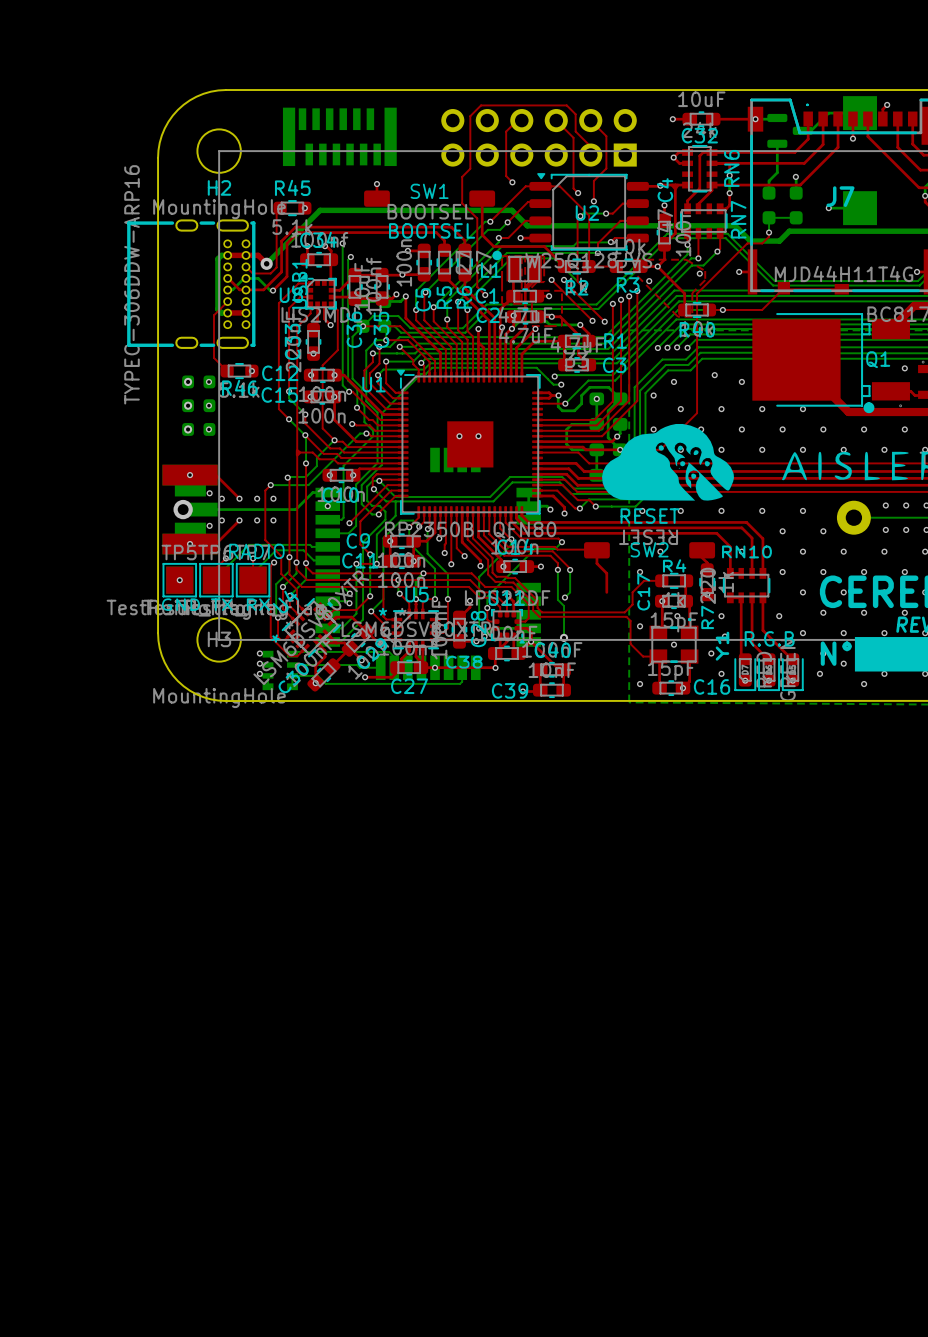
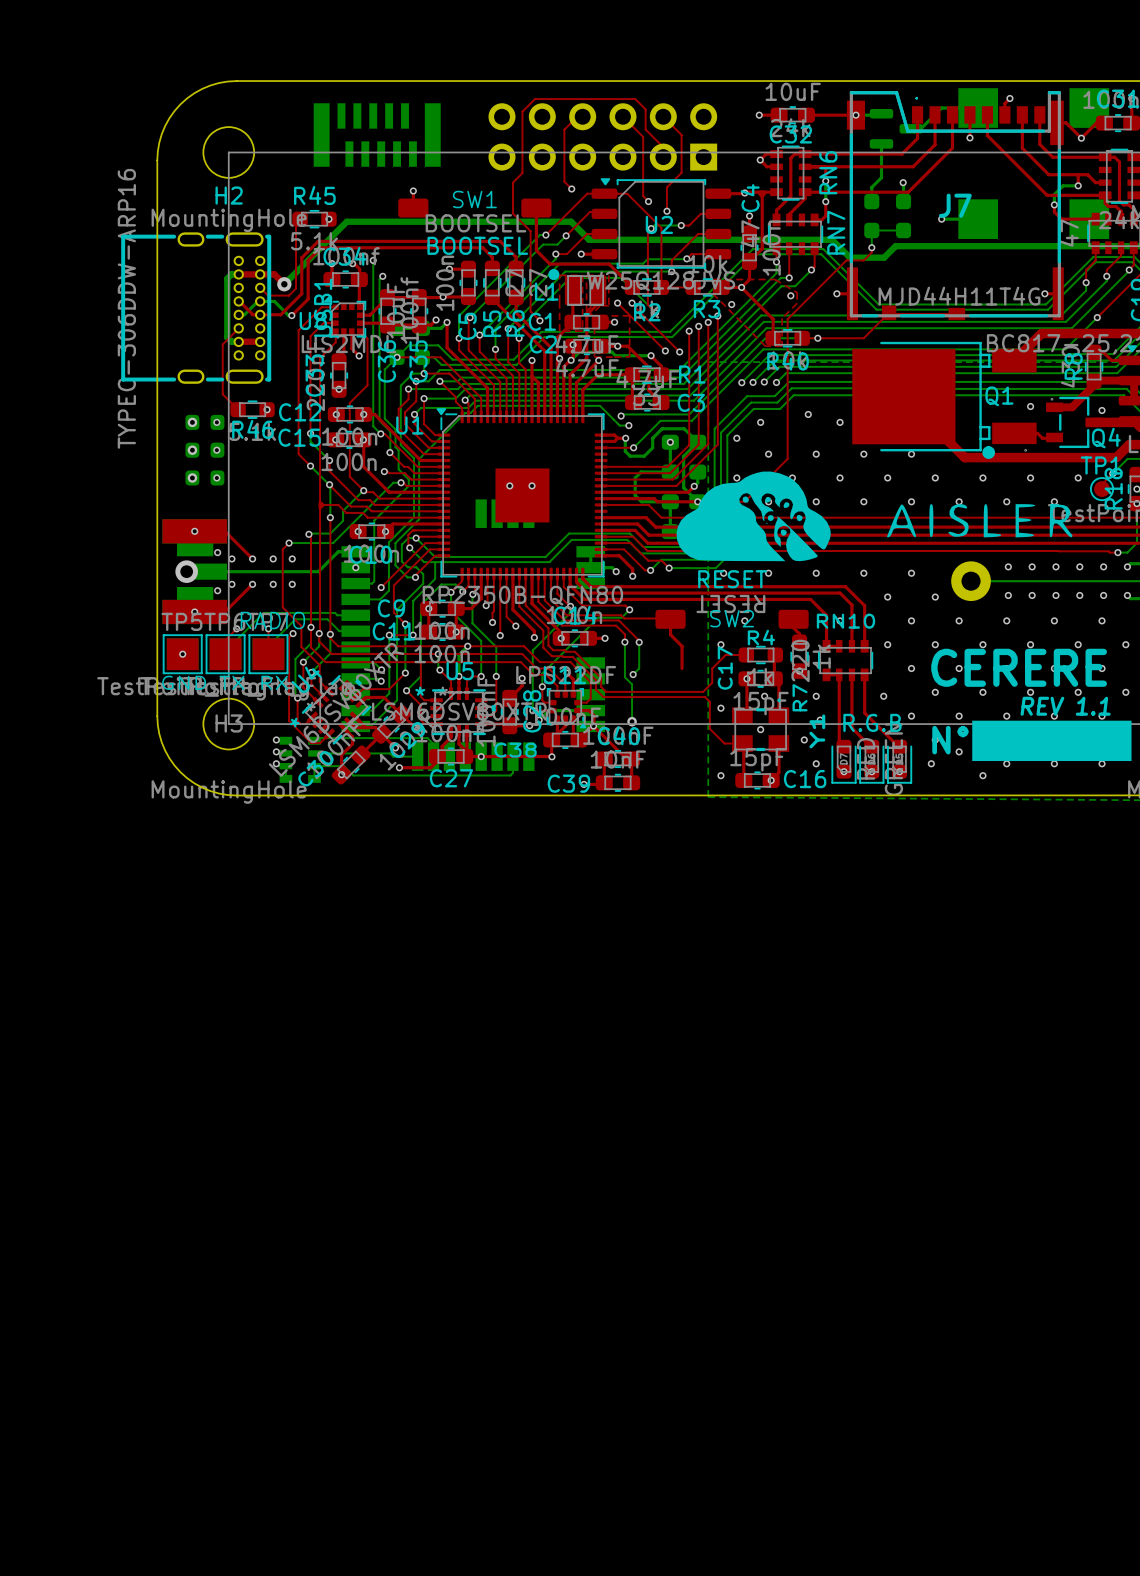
part footprint: [282, 107, 397, 167] -> [313, 103, 441, 167]

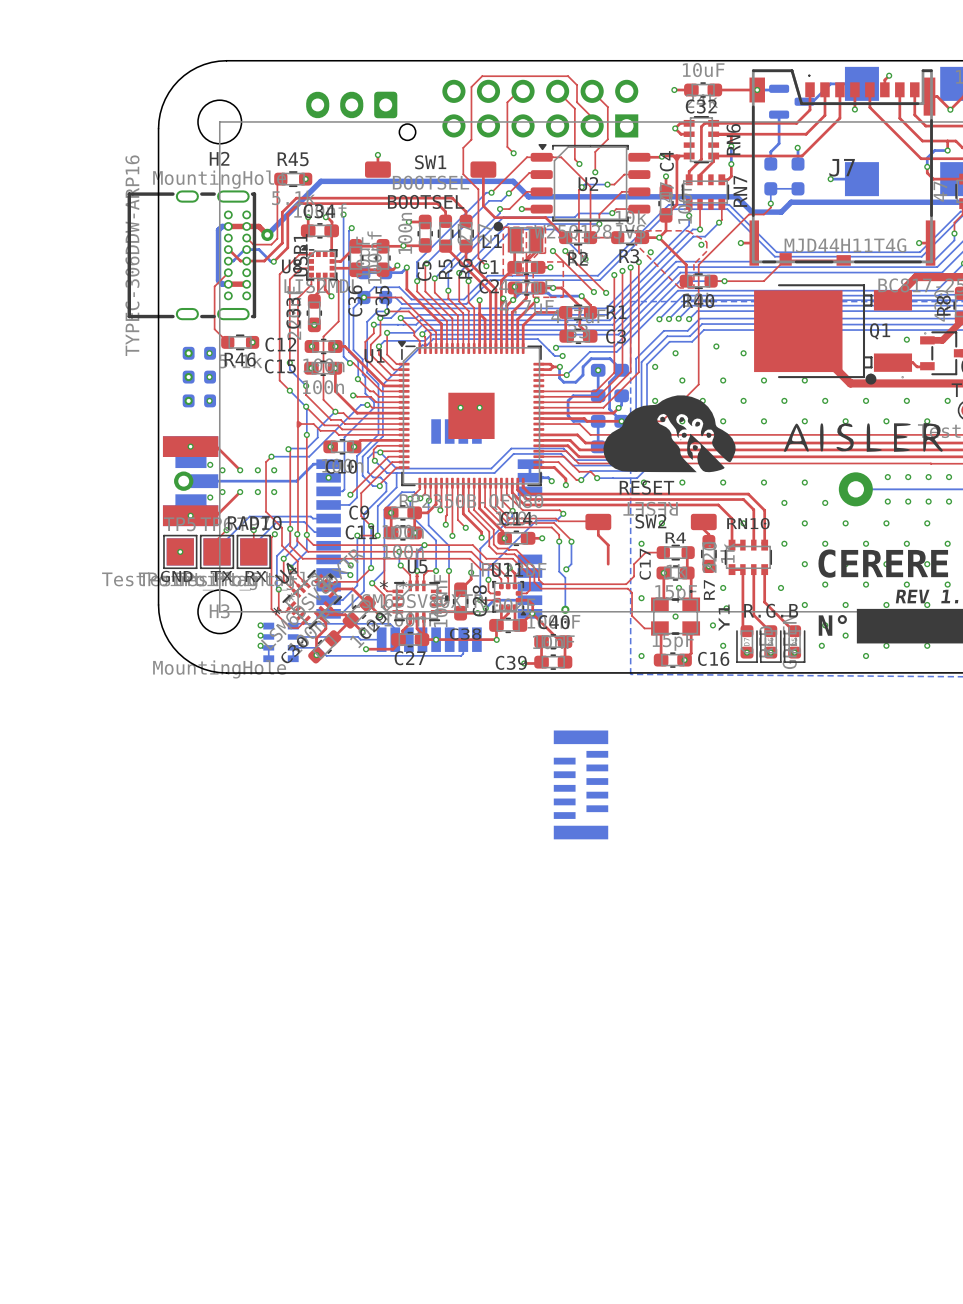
part: (377, 135) -> none
part: none -> (360, 116)
part: none -> (581, 784)

